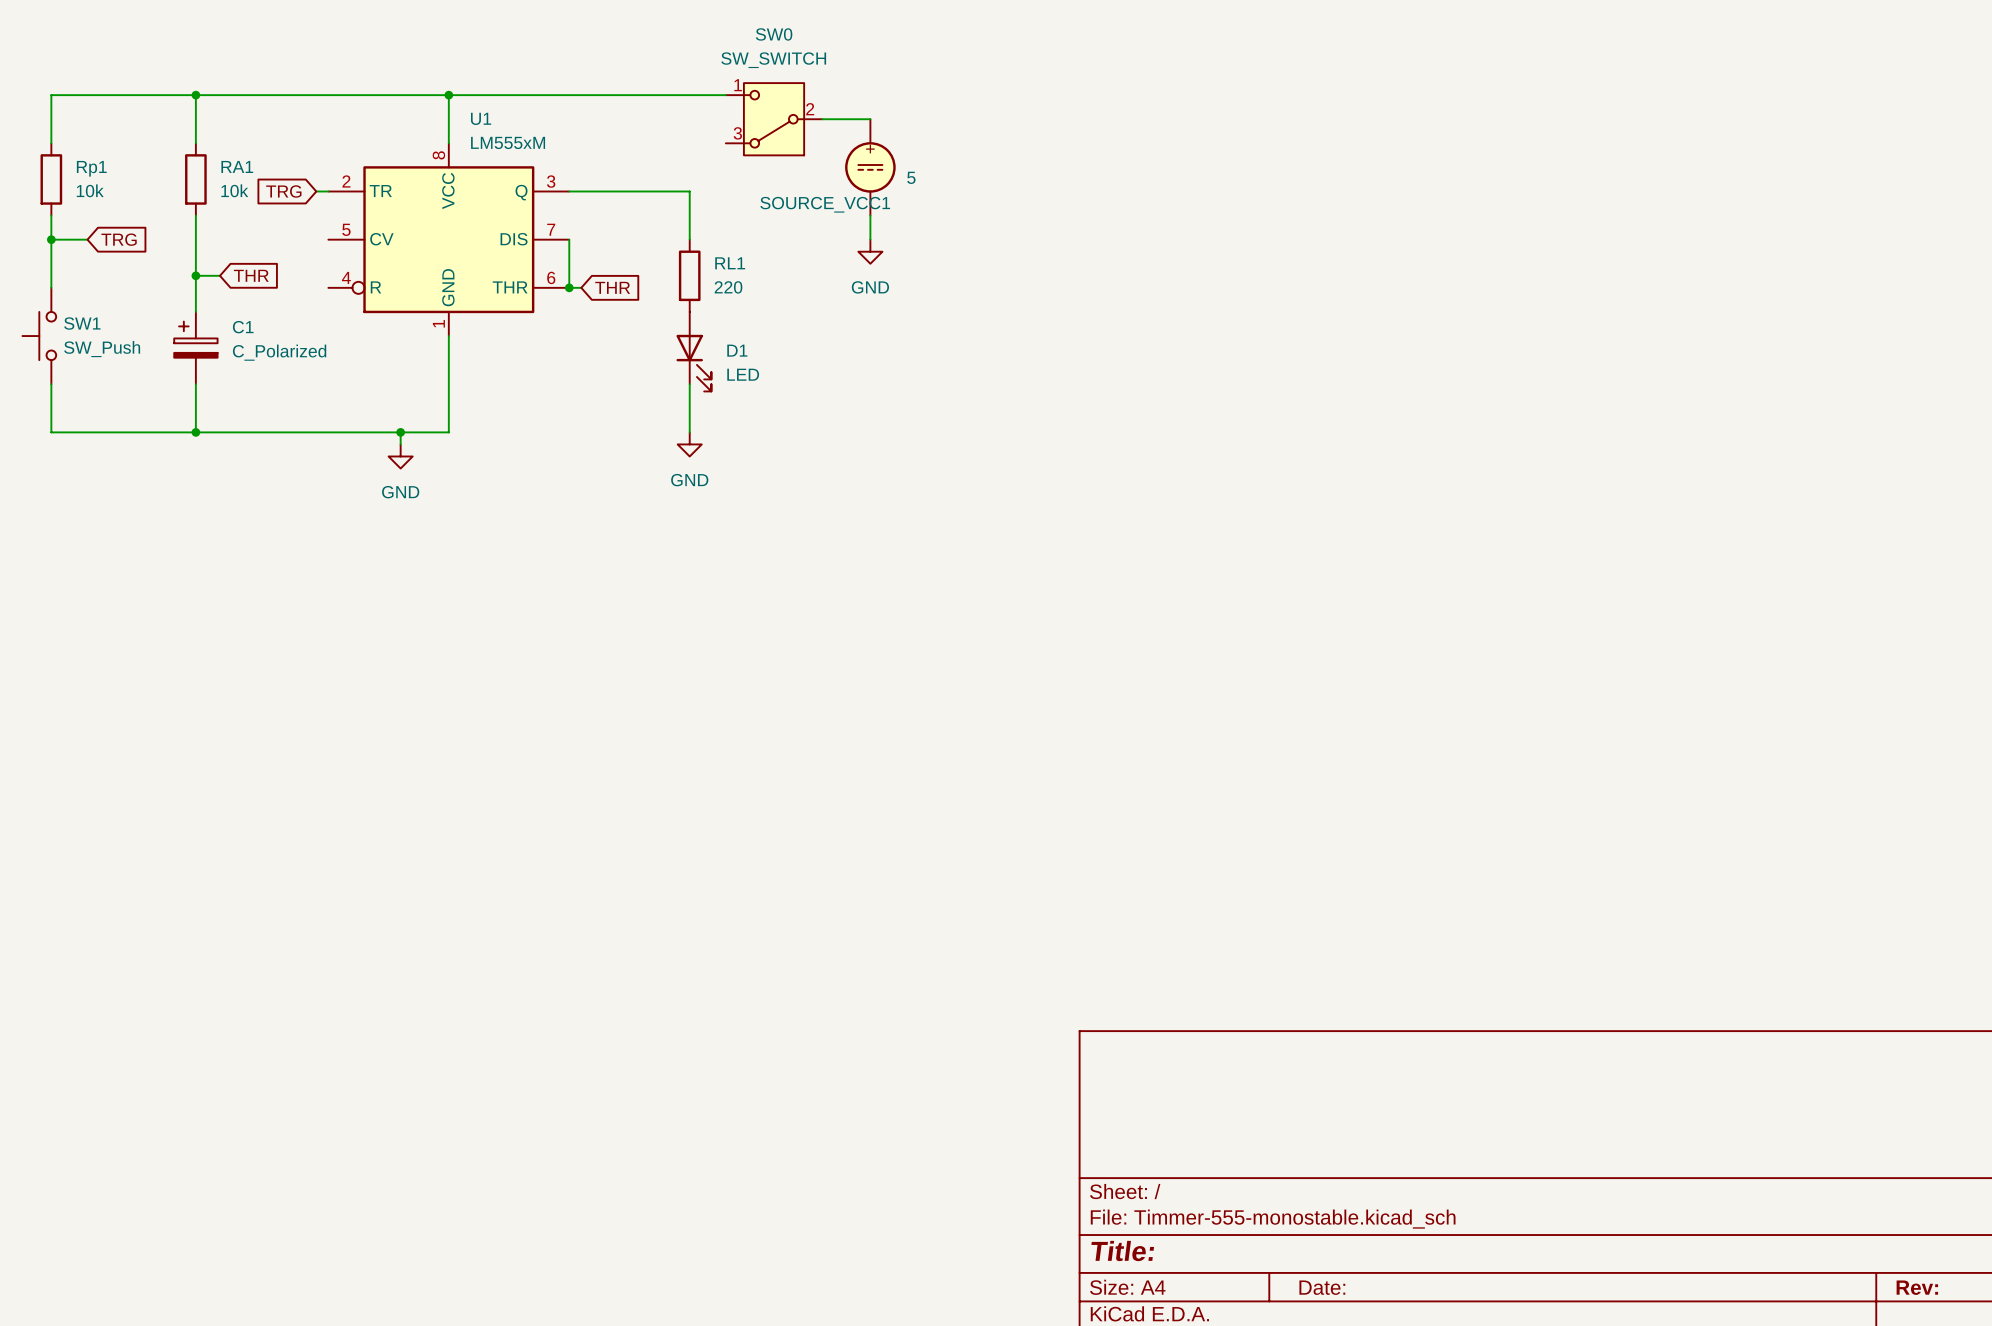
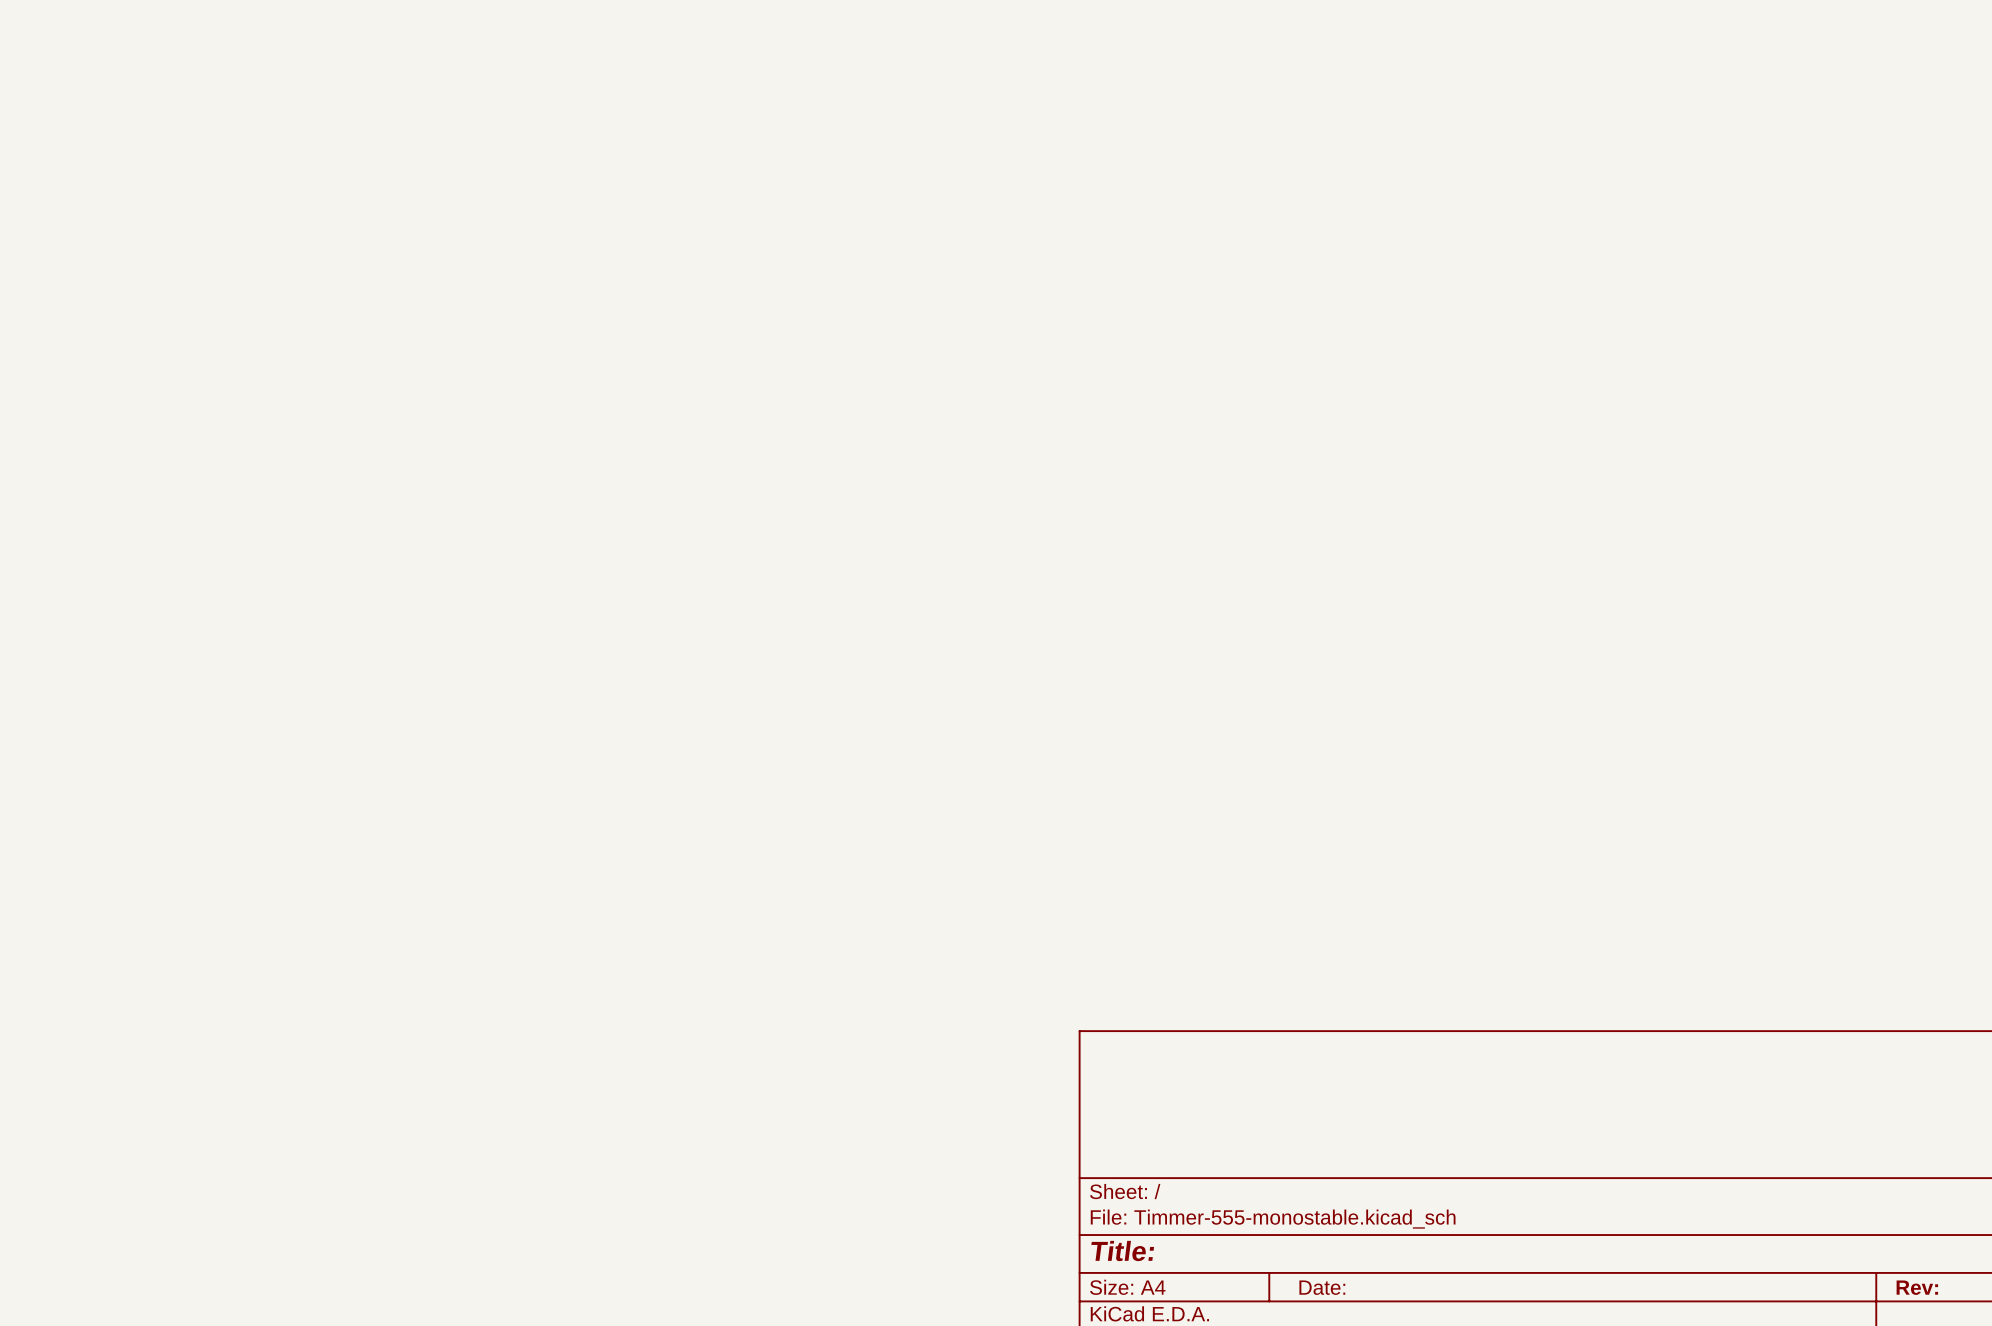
wire: (195, 95) (195, 143) -> none
junction: (195, 95) -> none
wire: (448, 95) (448, 143) -> none
junction: (448, 95) -> none
wire: (725, 95) (51, 95) (51, 143) -> none
SW0: SW_SWITCH (774, 119) -> none
wire: (822, 119) (870, 119) -> none
SOURCE_VCC1: 5 (870, 167) -> none
Rp1: 10k (51, 179) -> none
RA1: 10k (195, 179) -> none
global label: TRG (283, 191) -> none
wire: (316, 191) (328, 191) -> none
wire: (569, 191) (689, 191) (689, 239) -> none
wire: (51, 215) (51, 287) -> none
wire: (195, 215) (195, 311) -> none
wire: (870, 215) (870, 239) -> none
wire: (51, 239) (87, 239) -> none
junction: (51, 239) -> none
global label: TRG (119, 239) -> none
U1: LM555xM (448, 239) -> none
wire: (569, 239) (569, 287) (581, 287) -> none
power symbol: GND (870, 251) -> none
wire: (195, 275) (219, 275) -> none
junction: (195, 275) -> none
global label: THR (251, 275) -> none
RL1: 220 (689, 275) -> none
junction: (569, 287) -> none
global label: THR (612, 287) -> none
SW1: SW_Push (39, 336) -> none
wire: (448, 336) (448, 432) (51, 432) (51, 384) -> none
C1: C_Polarized (195, 348) -> none
D1: LED (693, 351) -> none
wire: (195, 384) (195, 432) -> none
wire: (689, 384) (689, 432) -> none
junction: (195, 432) -> none
wire: (400, 432) (400, 444) -> none
junction: (400, 432) -> none
power symbol: GND (689, 444) -> none
power symbol: GND (400, 456) -> none

